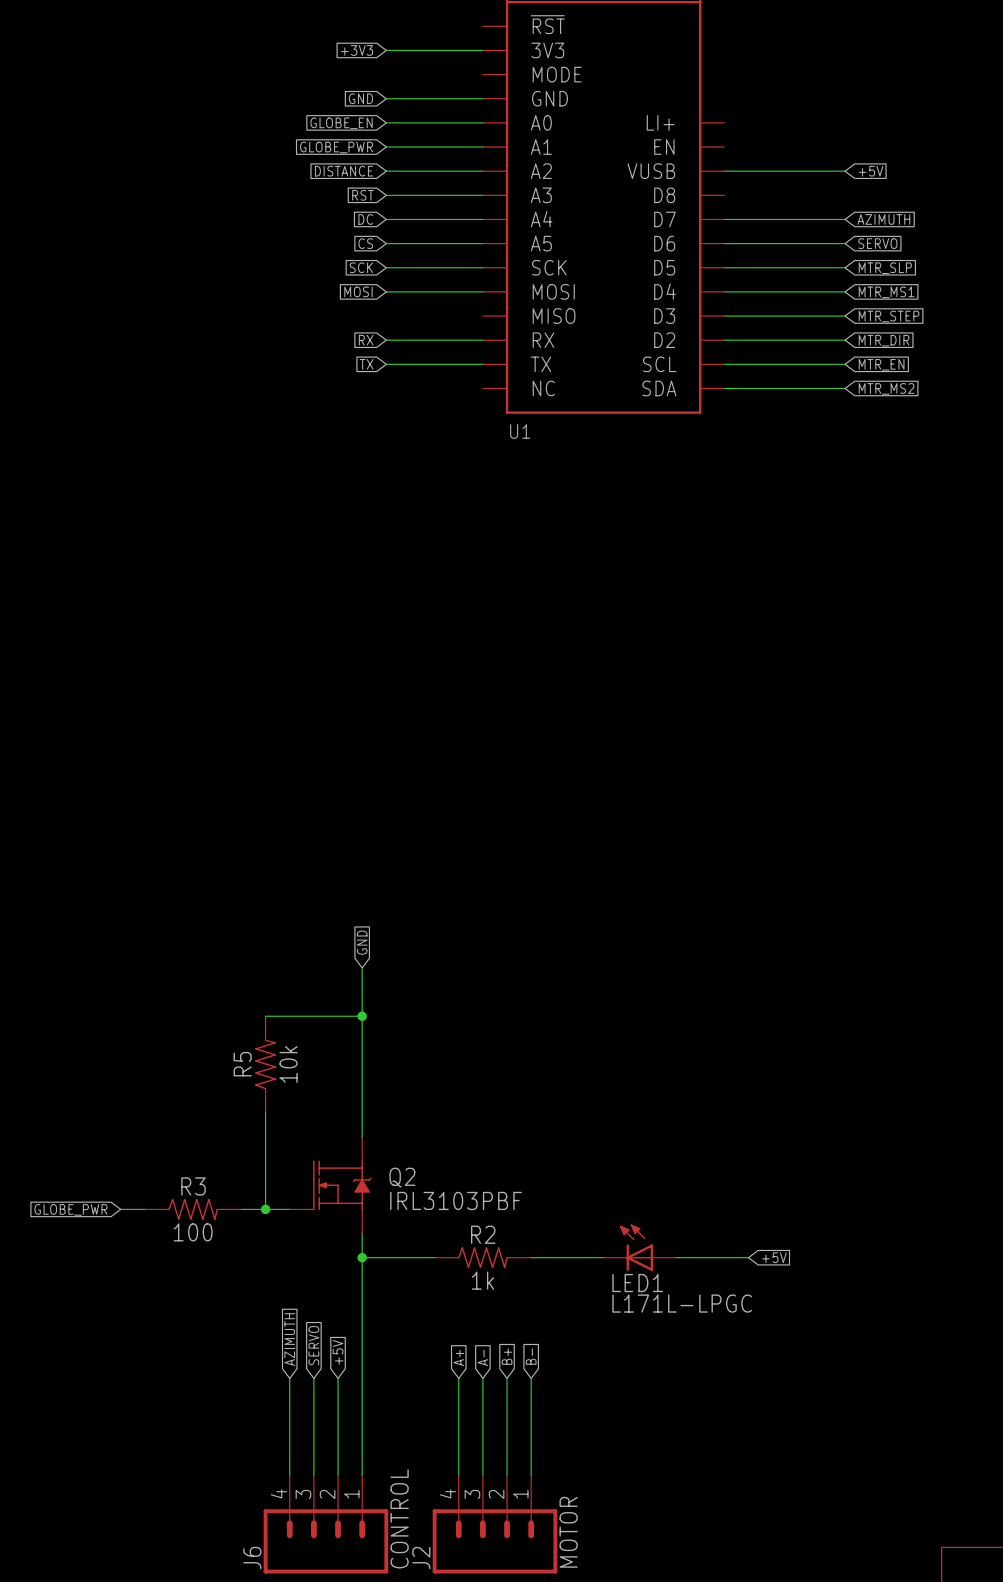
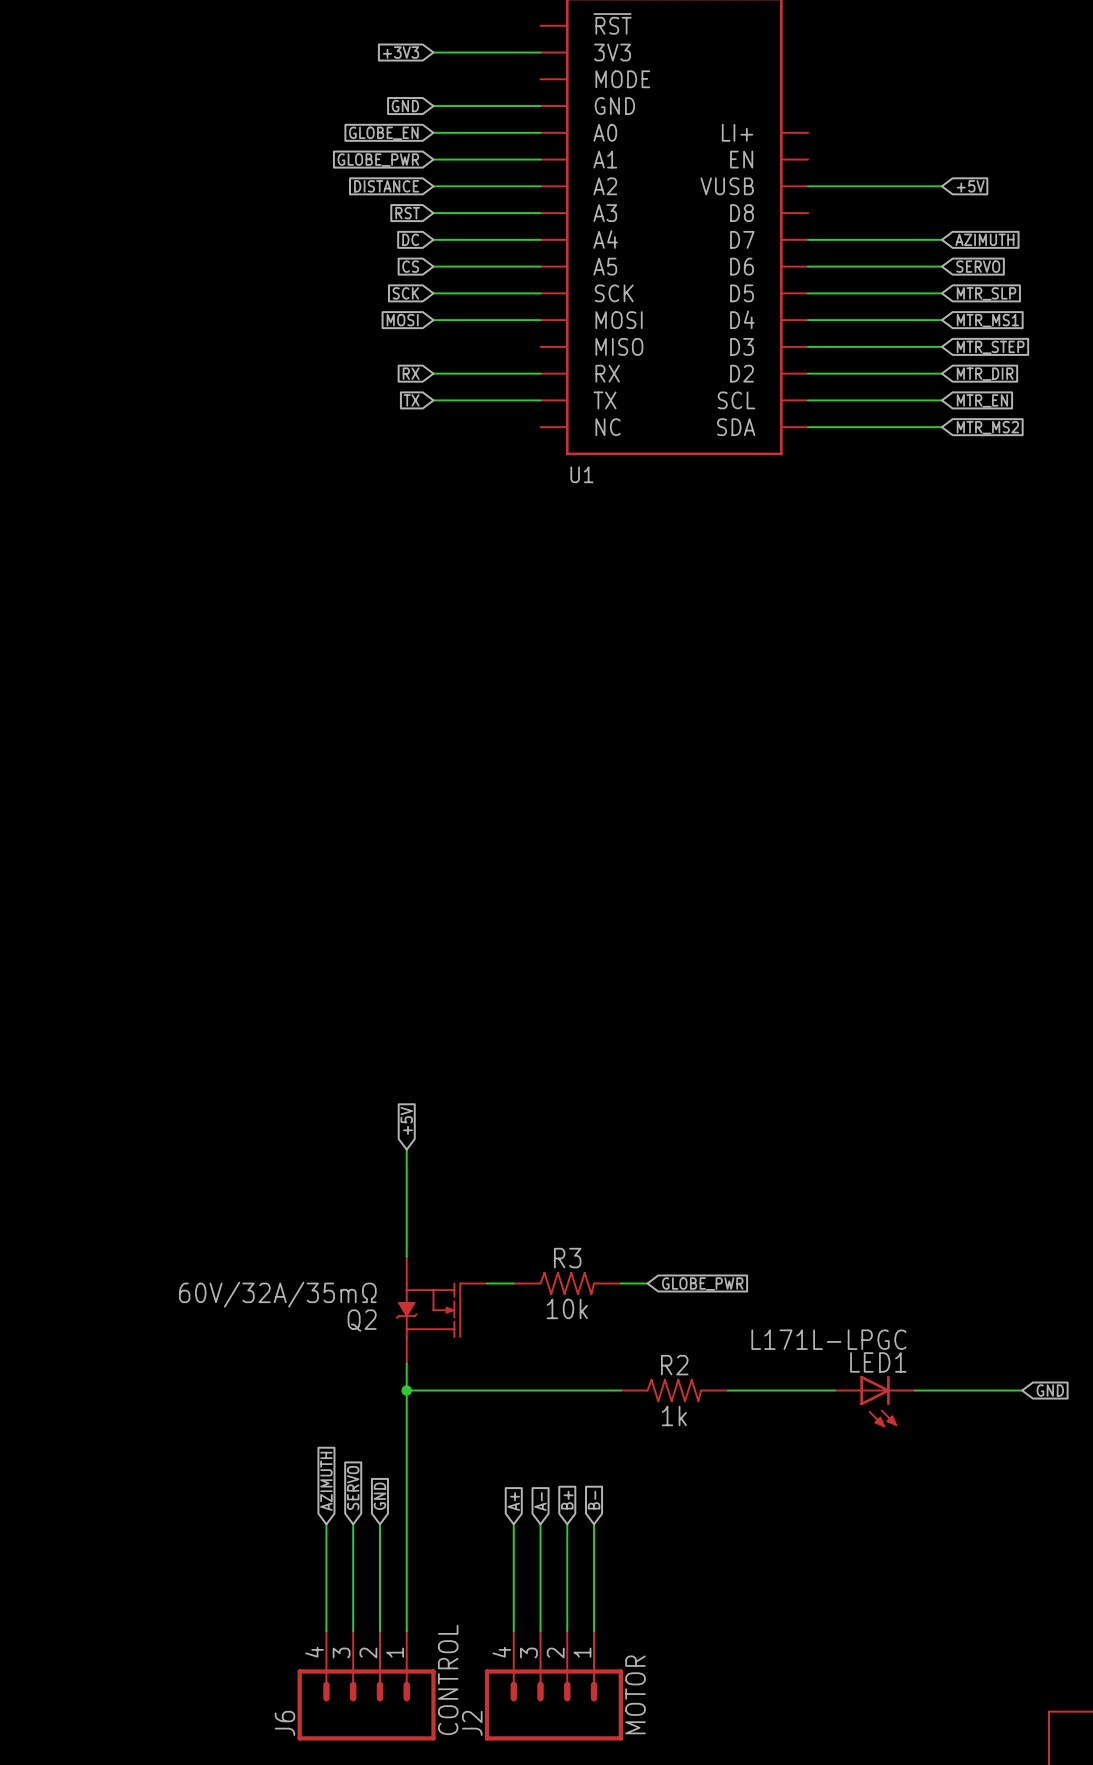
global label: GND (362, 942) -> none
wire: (362, 967) (362, 1040) -> none
global label: none -> +5V (406, 1120)
wire: (265, 1016) (362, 1016) -> none
junction: (362, 1016) -> none
R5: 10k (265, 1064) -> none
wire: (265, 1112) (265, 1209) -> none
wire: none -> (487, 1283) (513, 1283)
wire: none -> (620, 1283) (647, 1283)
global label: none -> GLOBE_PWR (702, 1284)
Q2 position: (330, 1185) -> (441, 1310)
Q2 rotation: 0° (342, 1185) -> 180° (428, 1310)
Q2 value: IRL3103PBF (456, 1200) -> 60V/32A/35mΩ (277, 1294)
global label: GLOBE_PWR (70, 1209) -> none
wire: (120, 1209) (144, 1209) -> none
R3 position: (193, 1209) -> (567, 1283)
wire: (241, 1209) (289, 1209) -> none
junction: (265, 1209) -> none
R3 value: 100 (193, 1232) -> 10k (567, 1308)
LED1 rotation: 0° (636, 1247) -> 180° (878, 1401)
LED1 position: (639, 1247) -> (875, 1401)
R2 position: (482, 1257) -> (674, 1390)
global label: +5V (774, 1257) -> none
wire: none -> (915, 1390) (1022, 1390)
global label: none -> GND (1050, 1390)
global label: +5V (338, 1352) -> GND (379, 1496)

